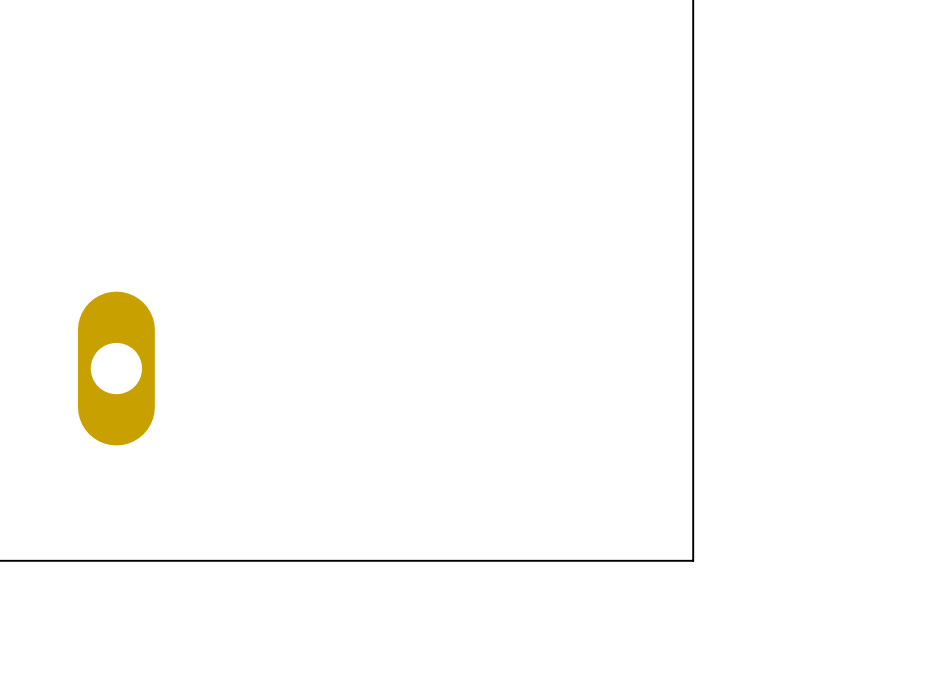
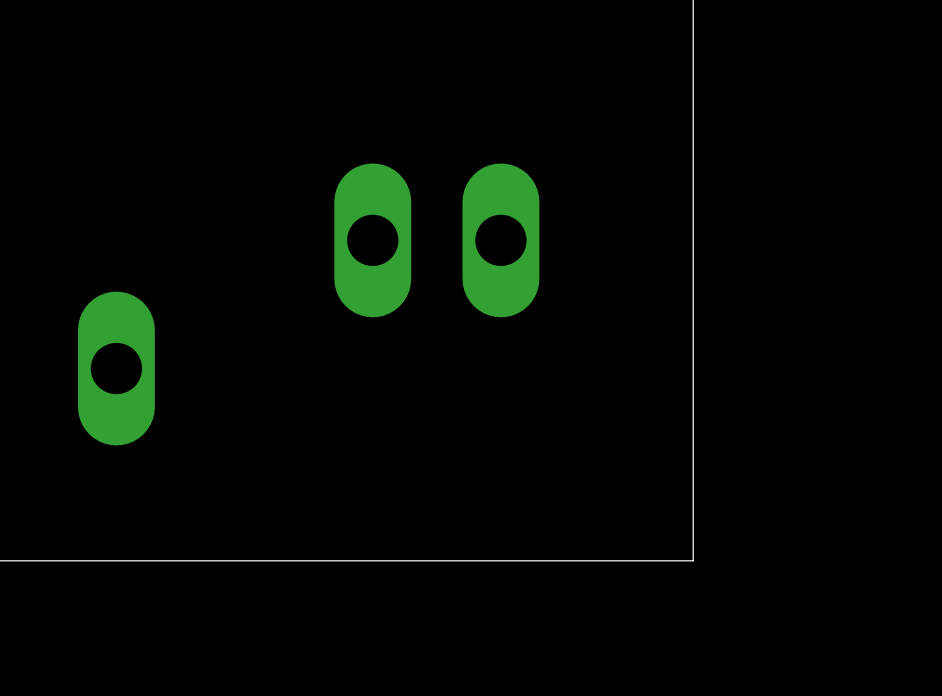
part: none -> (436, 240)

